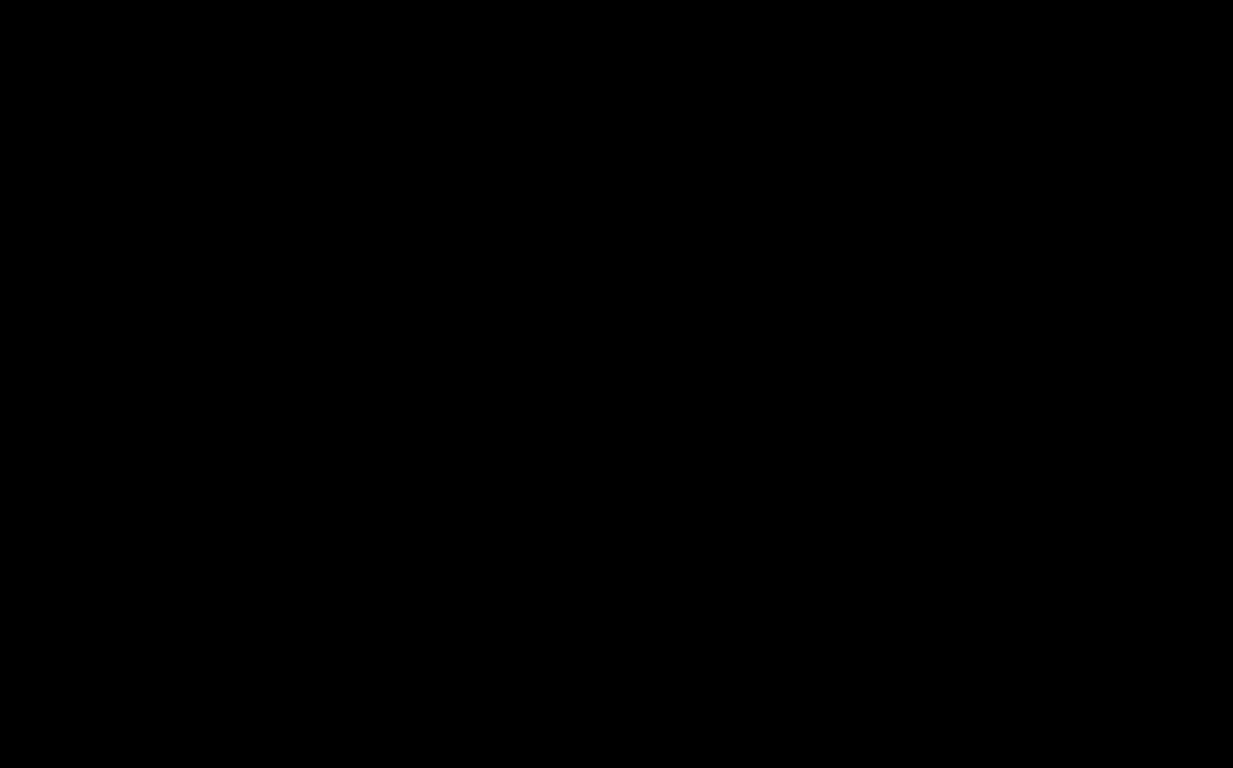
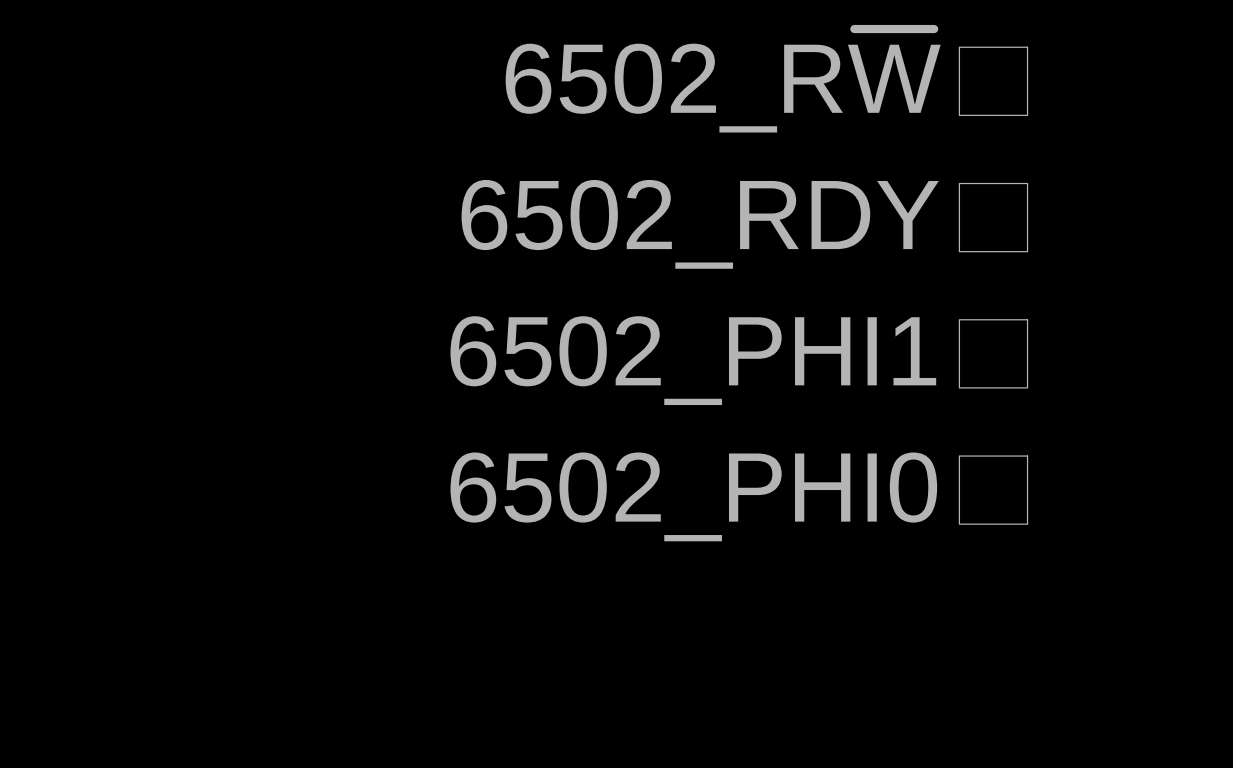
hierarchical label: none -> 6502_R~{W} (723, 80)
hierarchical label: none -> 6502_RDY (700, 224)
hierarchical label: none -> 6502_PHI1 (693, 360)
hierarchical label: none -> 6502_PHI0 (693, 496)

